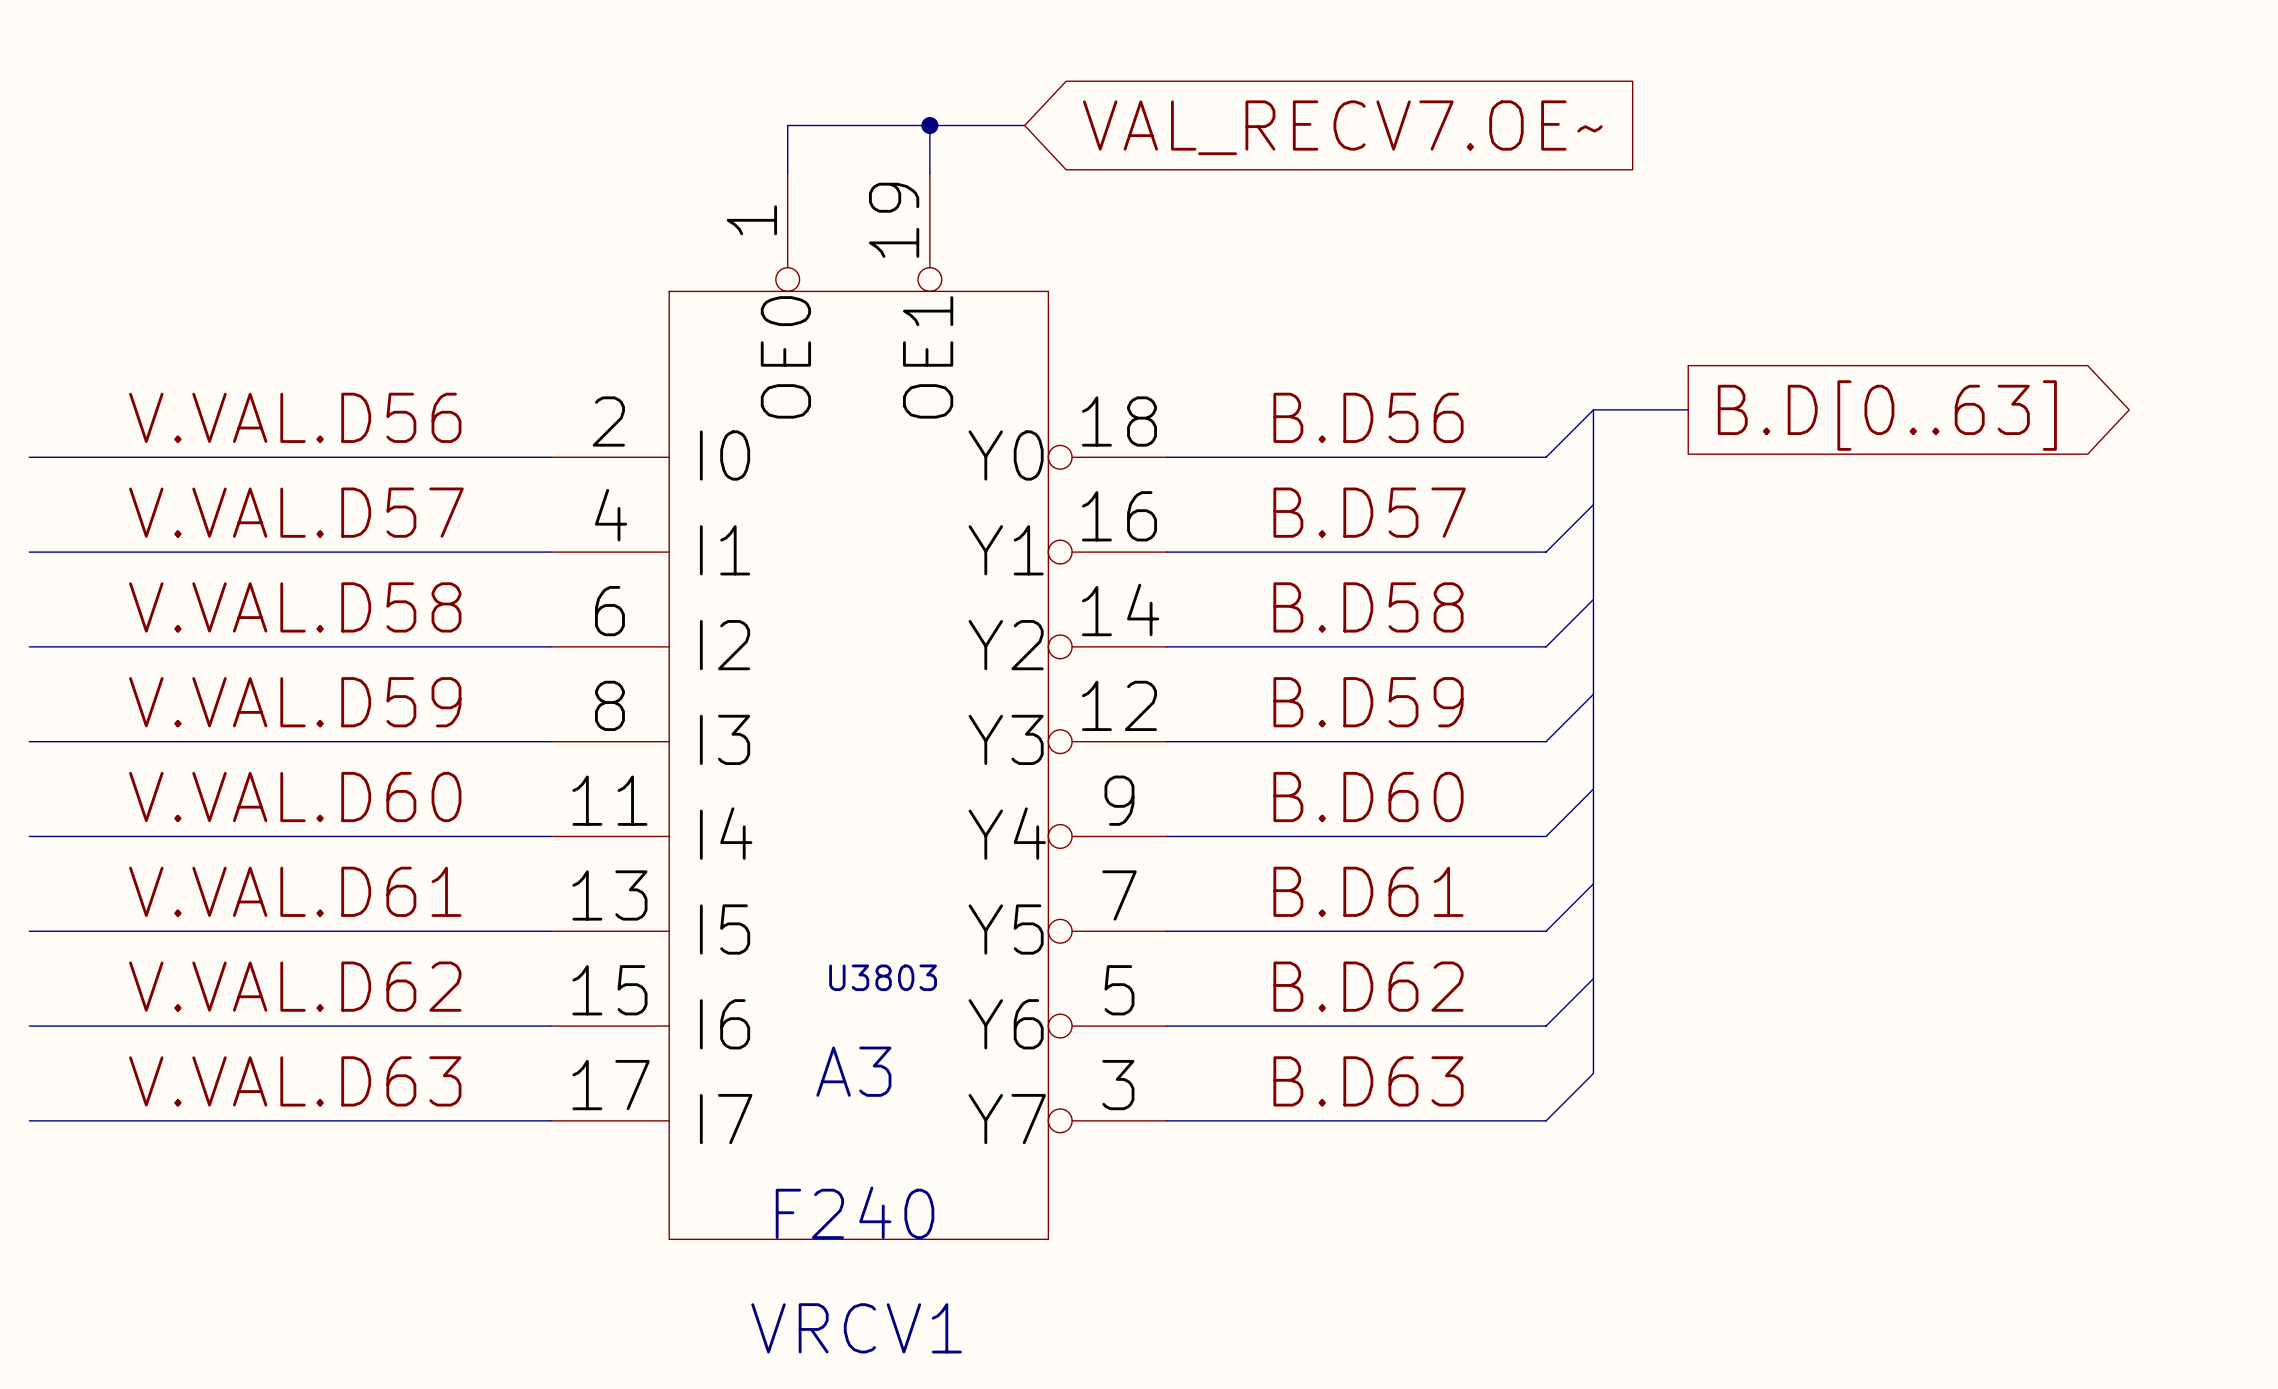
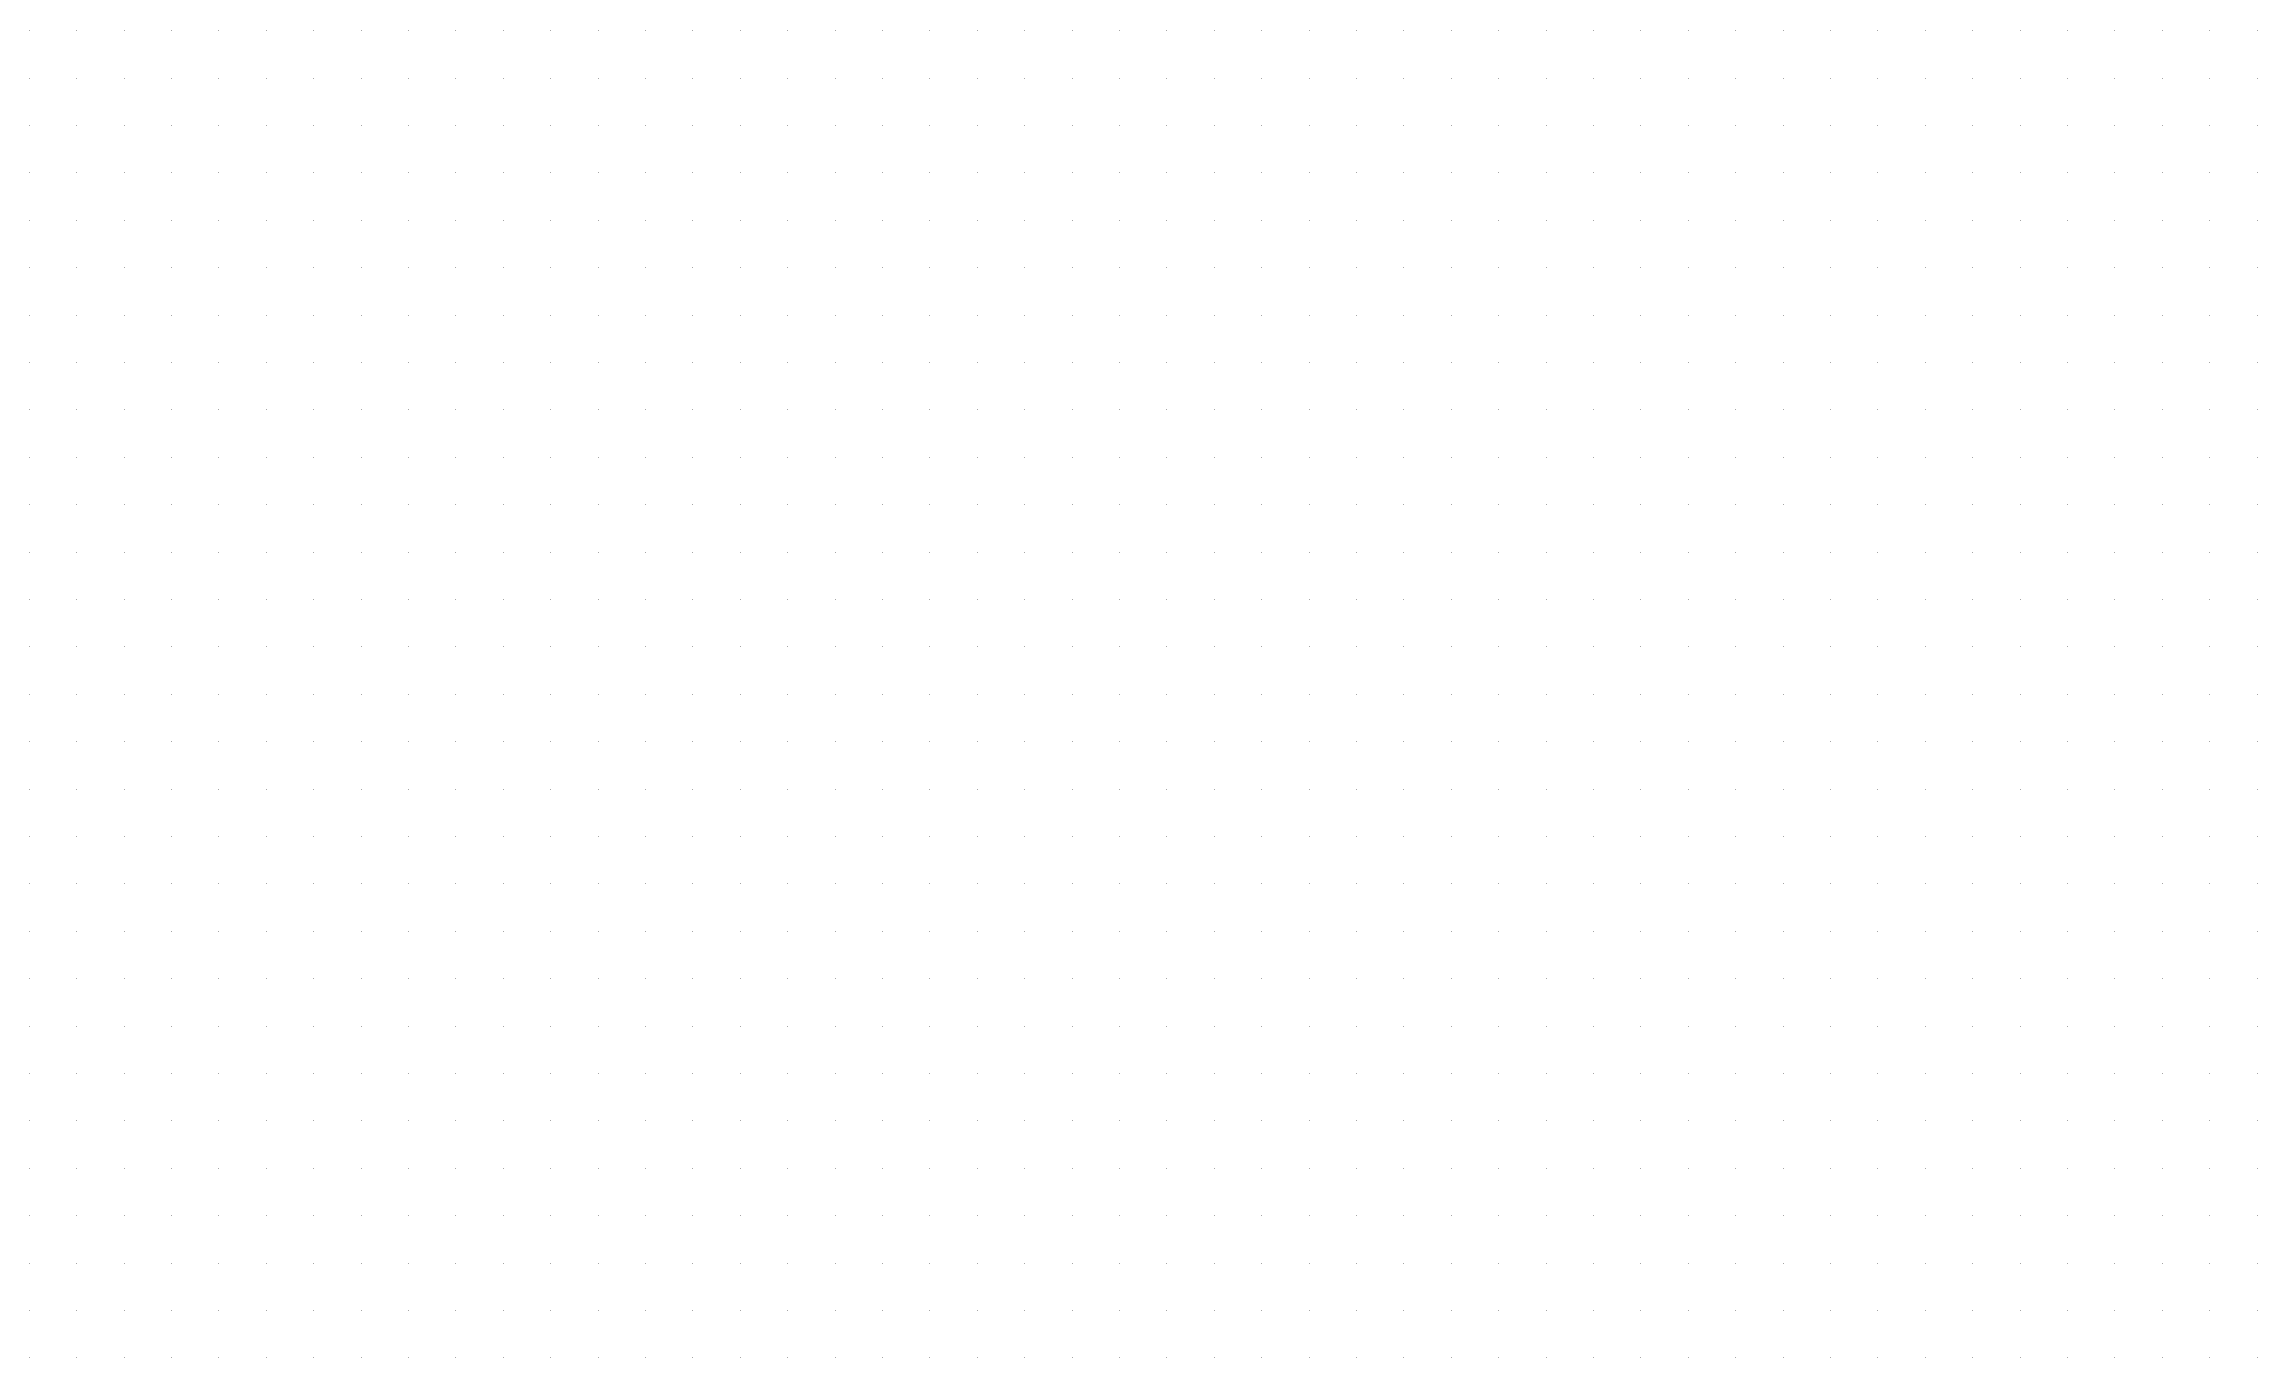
wire: (929, 125) (929, 172) -> none
junction: (929, 125) -> none
wire: (1024, 125) (787, 125) (787, 172) -> none
global label: VAL_RECV7.OE~ (1342, 127) -> none
wire: (1593, 409) (1546, 457) (1166, 457) -> none
bus: (1688, 409) (1593, 409) (1593, 1073) -> none
global label: B.D[0..63] (1887, 415) -> none
label: V.VAL.D56 (295, 417) -> none
label: B.D56 (1368, 417) -> none
wire: (29, 457) (550, 457) -> none
wire: (1593, 504) (1546, 552) (1166, 552) -> none
label: V.VAL.D57 (296, 512) -> none
label: B.D57 (1369, 512) -> none
wire: (29, 552) (550, 552) -> none
wire: (1593, 599) (1546, 646) (1166, 646) -> none
label: V.VAL.D58 (295, 607) -> none
label: B.D58 (1368, 607) -> none
wire: (29, 646) (550, 646) -> none
wire: (1593, 694) (1546, 741) (1166, 741) -> none
label: V.VAL.D59 (295, 702) -> none
label: B.D59 (1368, 702) -> none
U3803: F240 (858, 706) -> none
wire: (29, 741) (550, 741) -> none
wire: (1593, 789) (1546, 836) (1166, 836) -> none
label: V.VAL.D60 (295, 797) -> none
label: B.D60 (1368, 797) -> none
wire: (29, 836) (550, 836) -> none
wire: (1593, 883) (1546, 931) (1166, 931) -> none
label: V.VAL.D61 (295, 891) -> none
label: B.D61 (1368, 891) -> none
wire: (29, 931) (550, 931) -> none
wire: (1593, 978) (1546, 1026) (1166, 1026) -> none
label: V.VAL.D62 (295, 986) -> none
label: B.D62 (1368, 986) -> none
wire: (29, 1026) (550, 1026) -> none
wire: (1593, 1073) (1546, 1120) (1166, 1120) -> none
label: V.VAL.D63 (295, 1081) -> none
label: B.D63 (1368, 1081) -> none
wire: (29, 1120) (550, 1120) -> none

